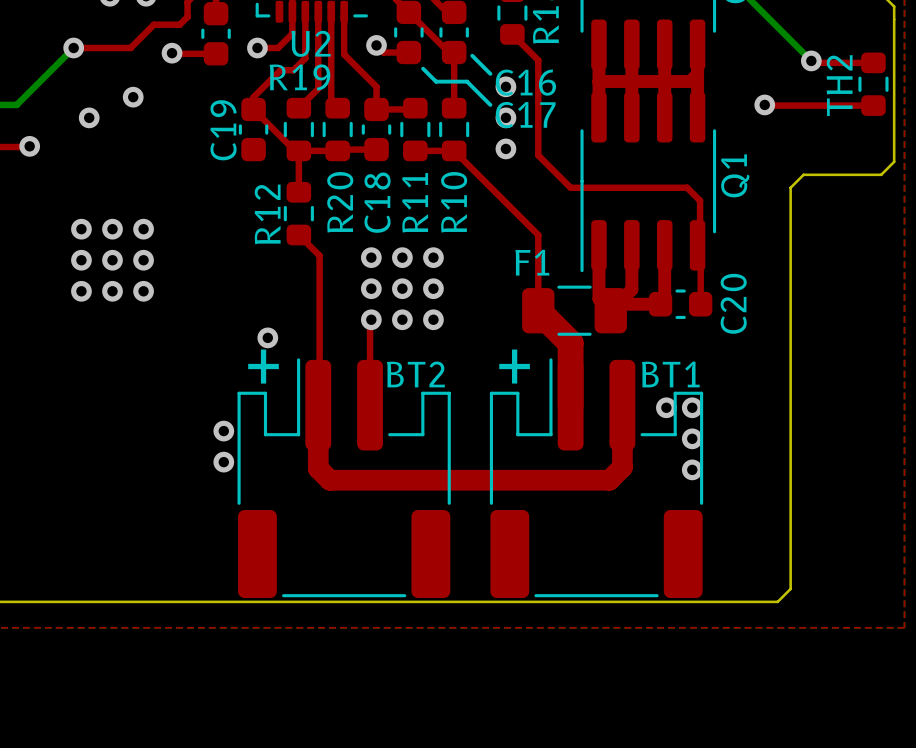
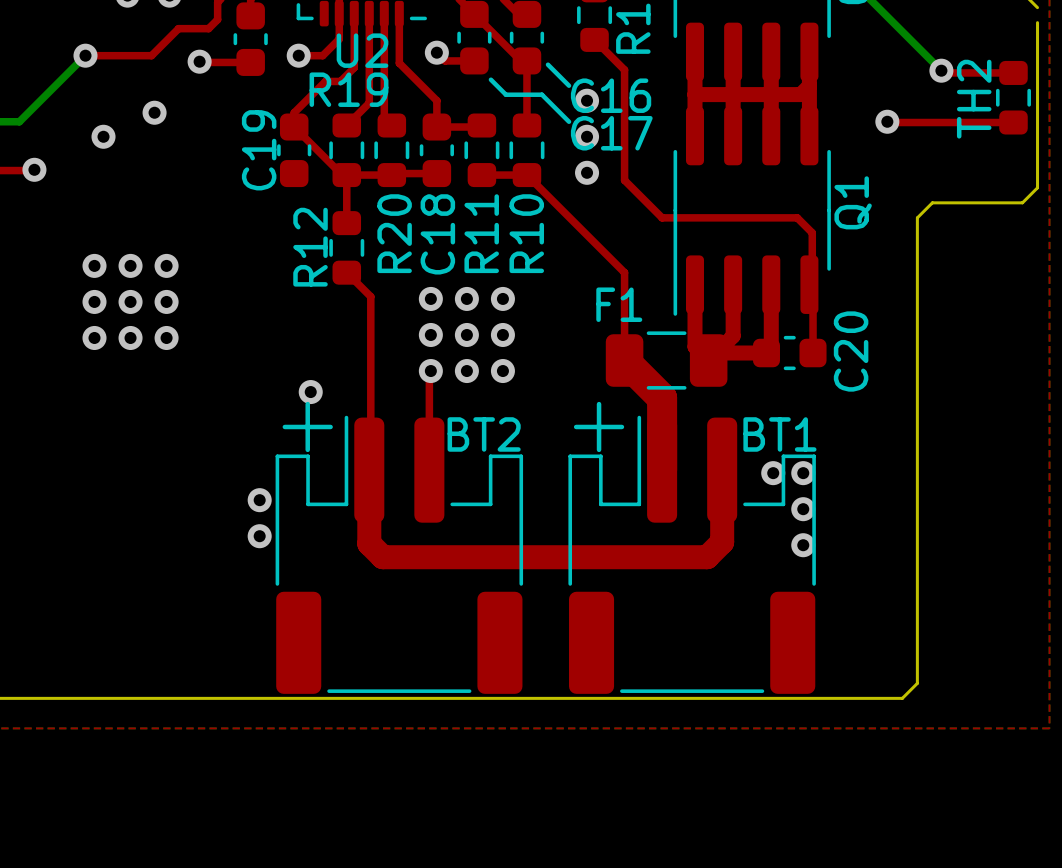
board edge: (894, 6) (894, 19) -> none

